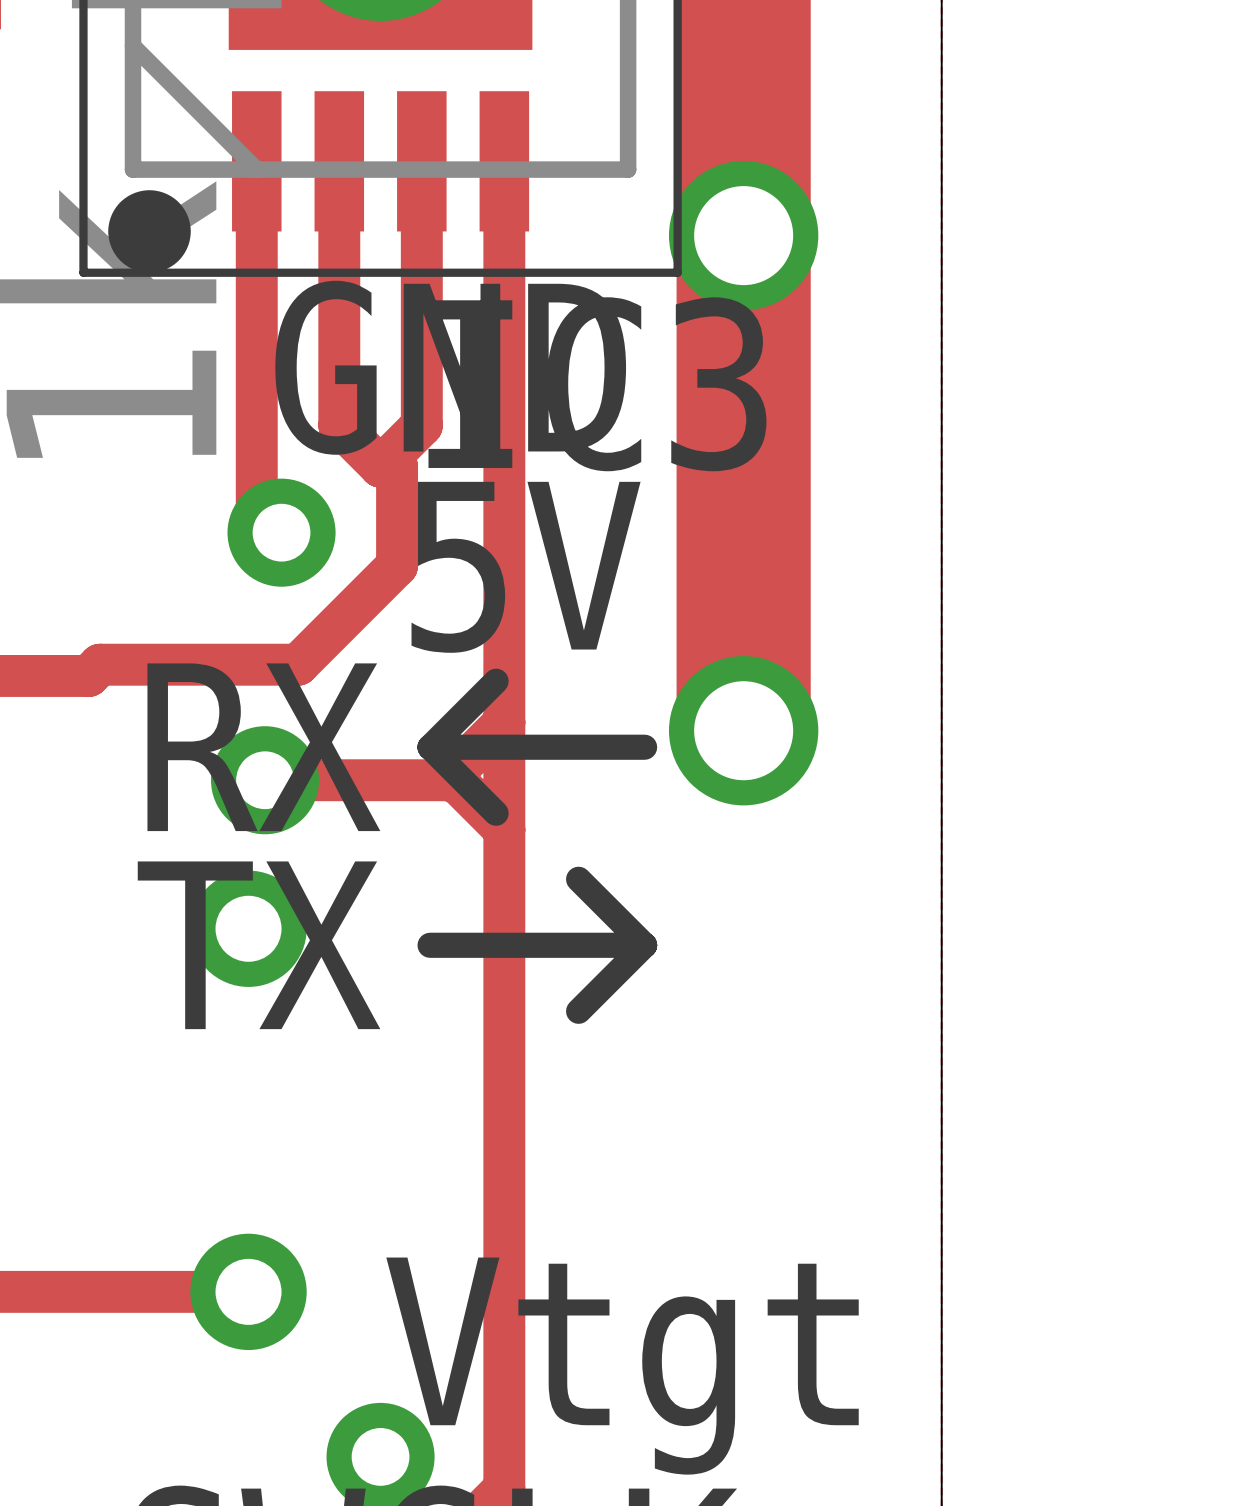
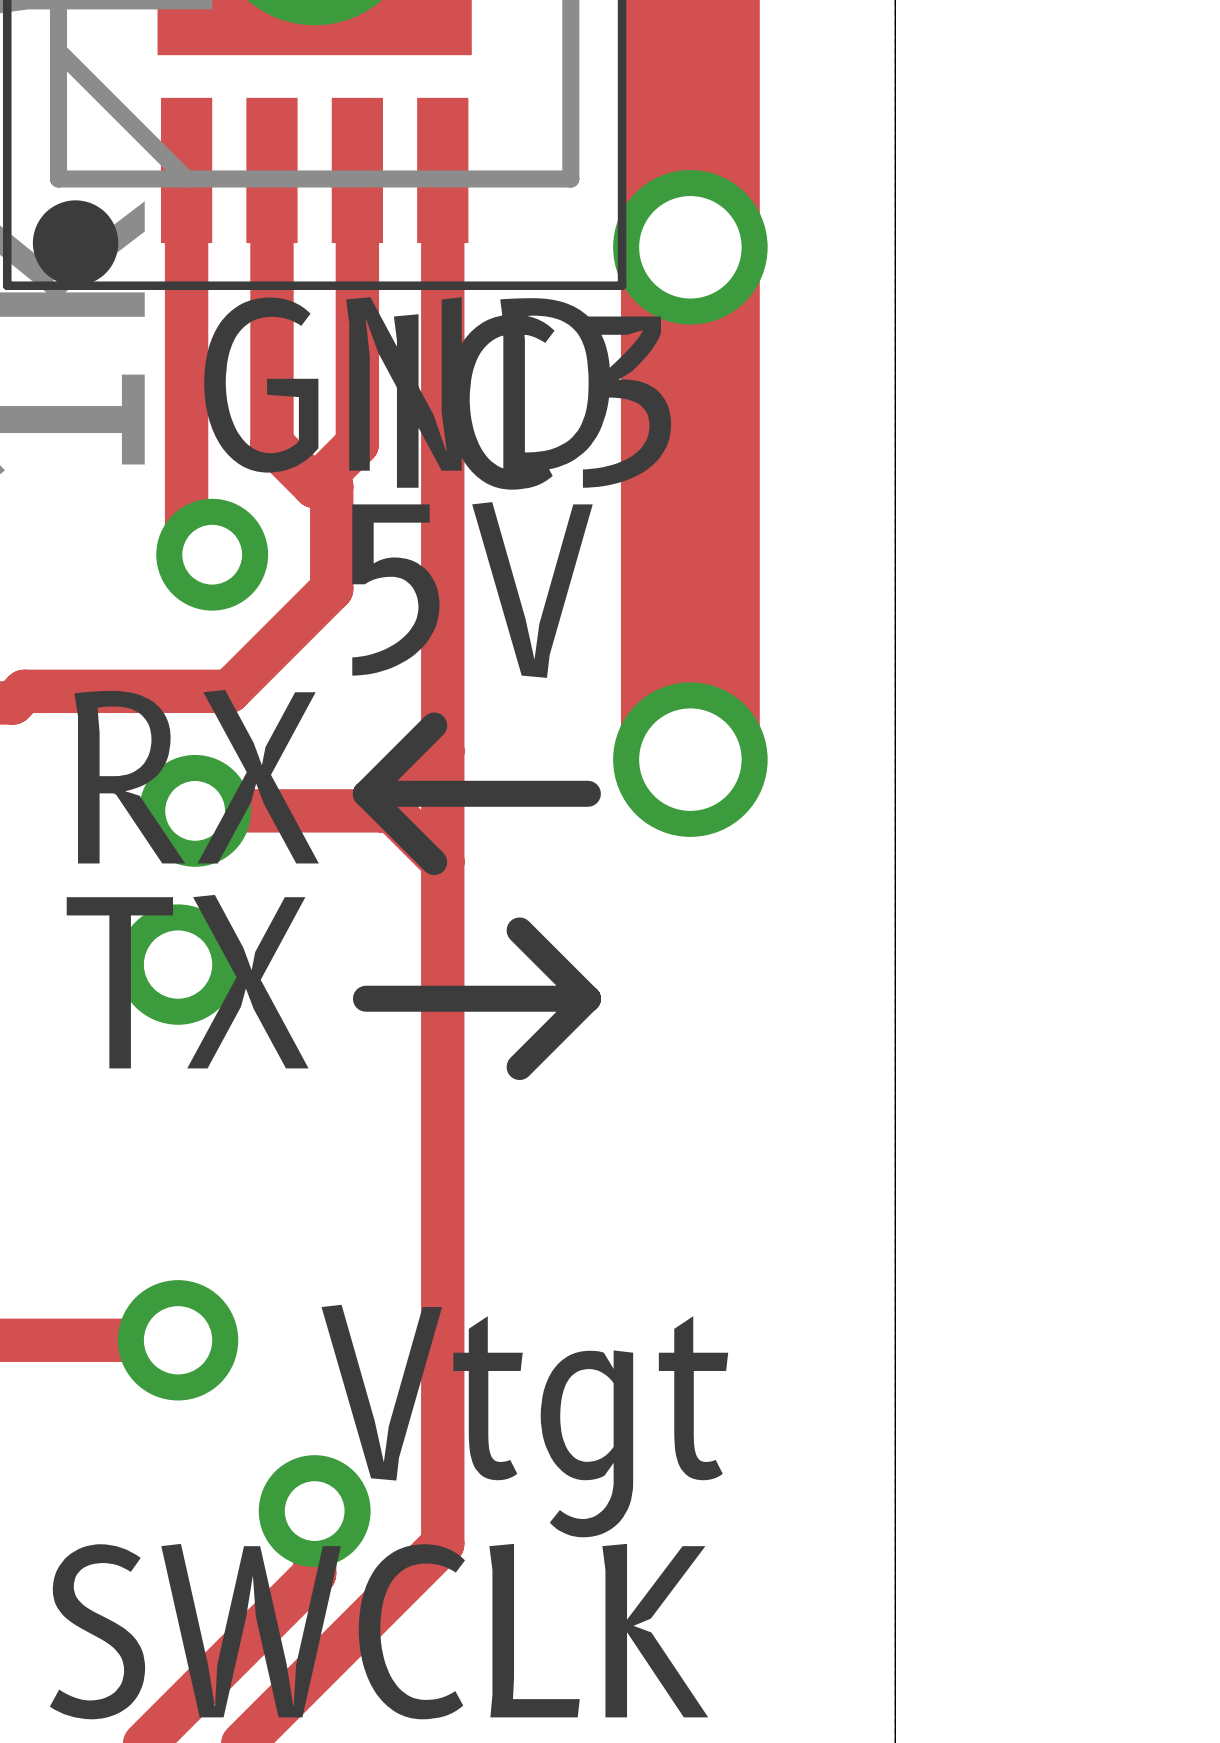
line: (496, 681) (430, 747) -> (434, 725) (365, 793)
line: (430, 747) (644, 747) -> (365, 793) (587, 793)
line: (430, 747) (496, 813) -> (365, 793) (434, 862)
line: (578, 879) (644, 945) -> (519, 930) (587, 998)
line: (430, 945) (644, 945) -> (365, 998) (587, 998)
line: (644, 945) (578, 1011) -> (587, 998) (519, 1067)

